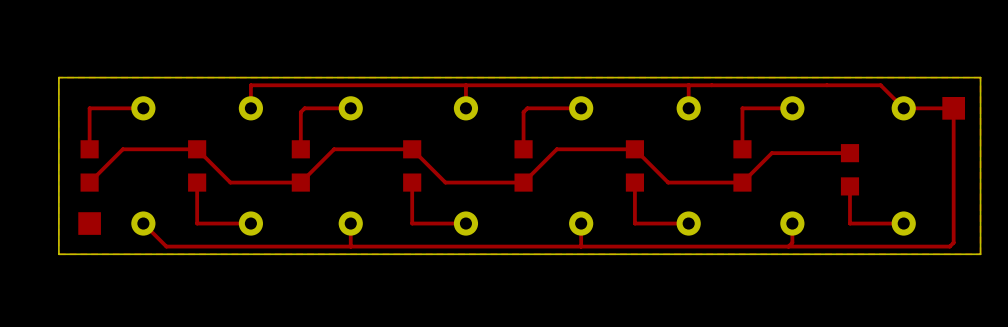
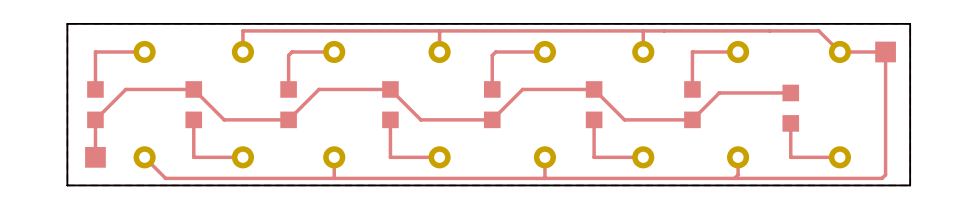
top track: none -> (98, 118) (95, 121) (95, 157)

